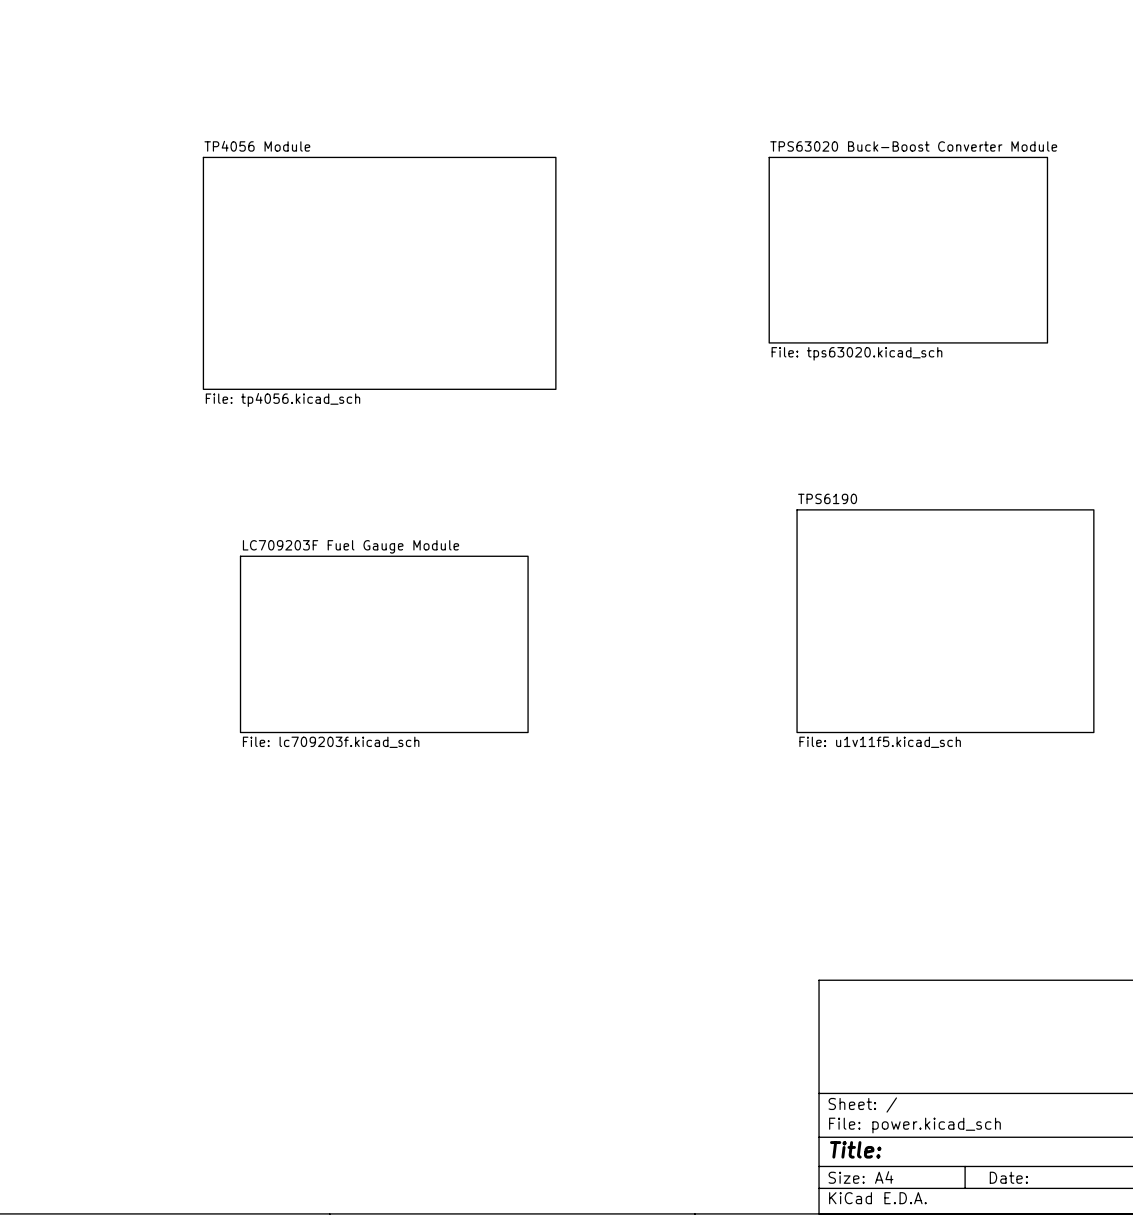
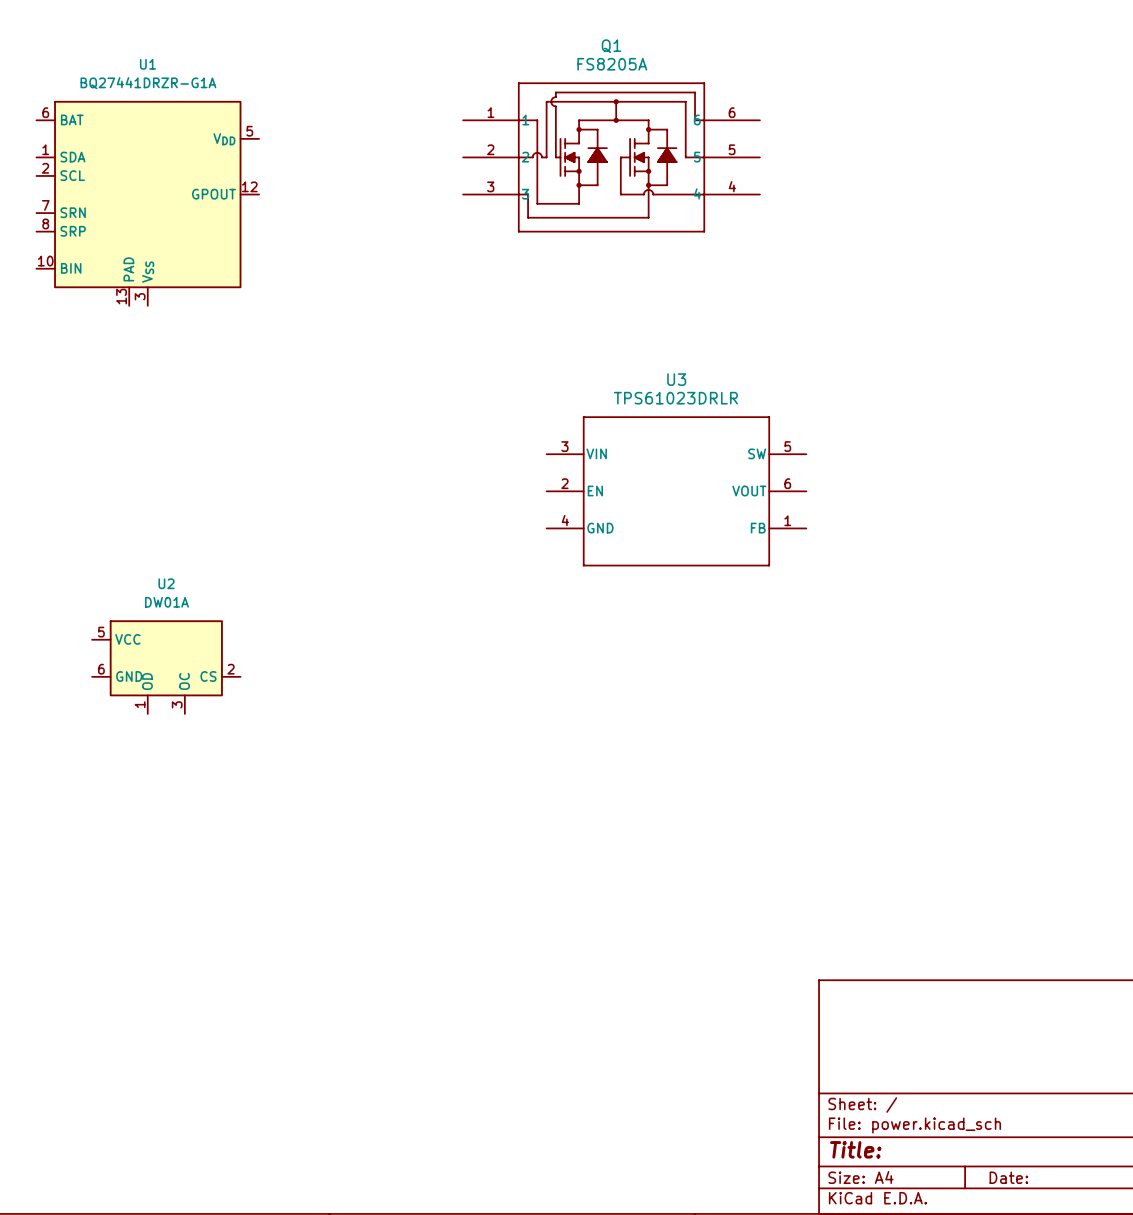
Q1: none -> FS8205A (611, 157)
U1: none -> BQ27441DRZR-G1A (147, 203)
sheet TPS63020 Buck-Boost Converter Module: File: tps63020.kicad_sch (908, 250) -> none
sheet TP4056 Module: File: tp4056.kicad_sch (379, 273) -> none
U3: none -> TPS61023DRLR (676, 491)
sheet TPS6190: File: u1v11f5.kicad_sch (945, 621) -> none
sheet LC709203F Fuel Gauge Module: File: lc709203f.kicad_sch (384, 644) -> none
U2: none -> DW01A (166, 667)

